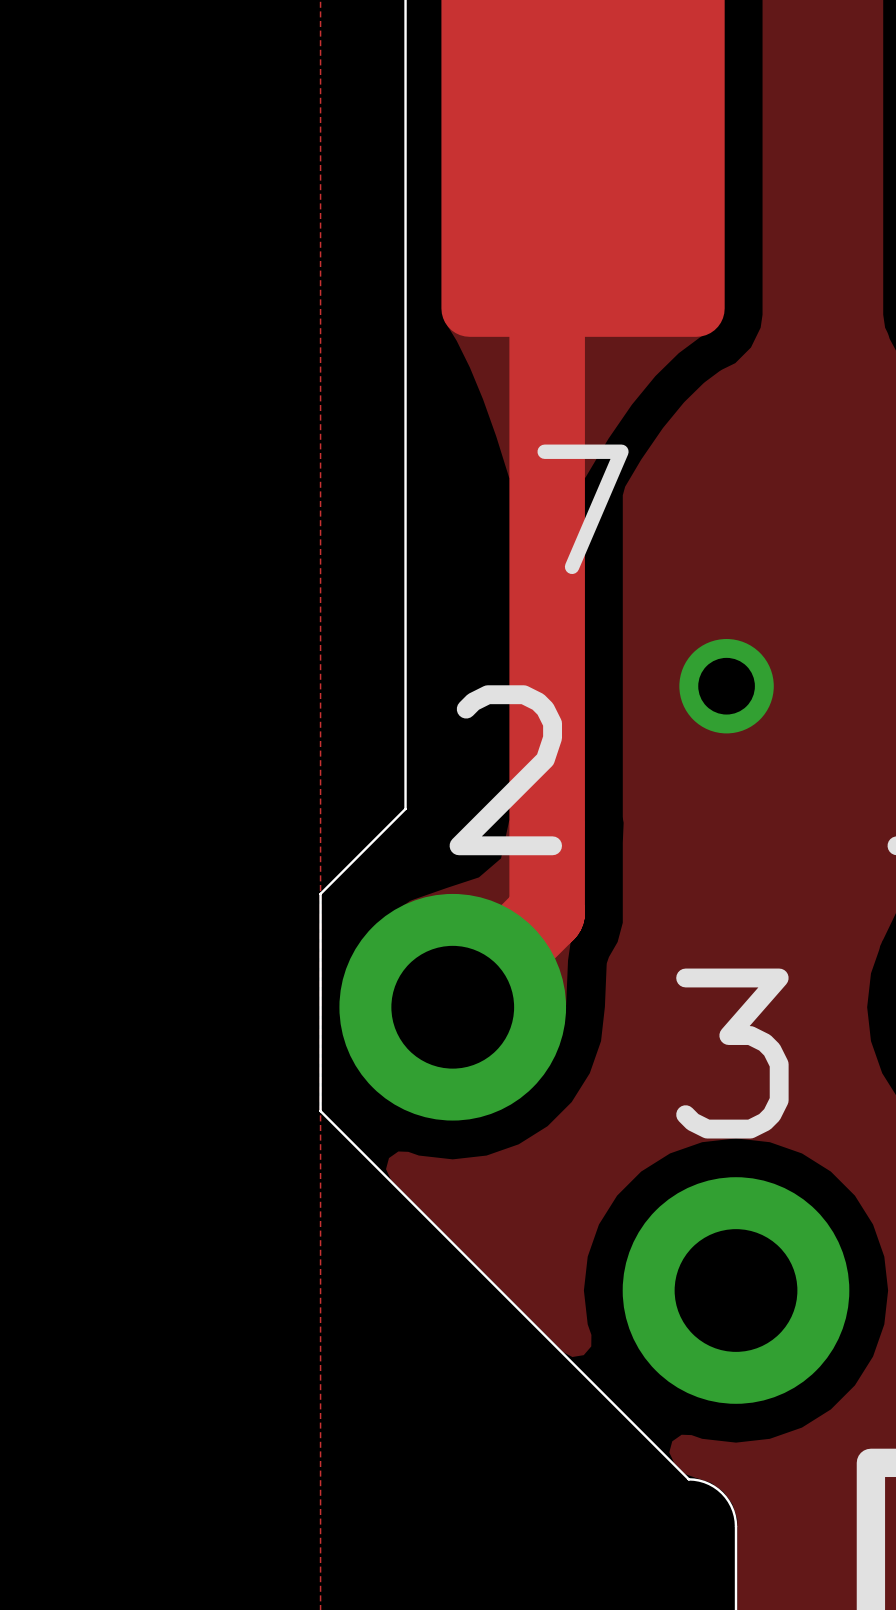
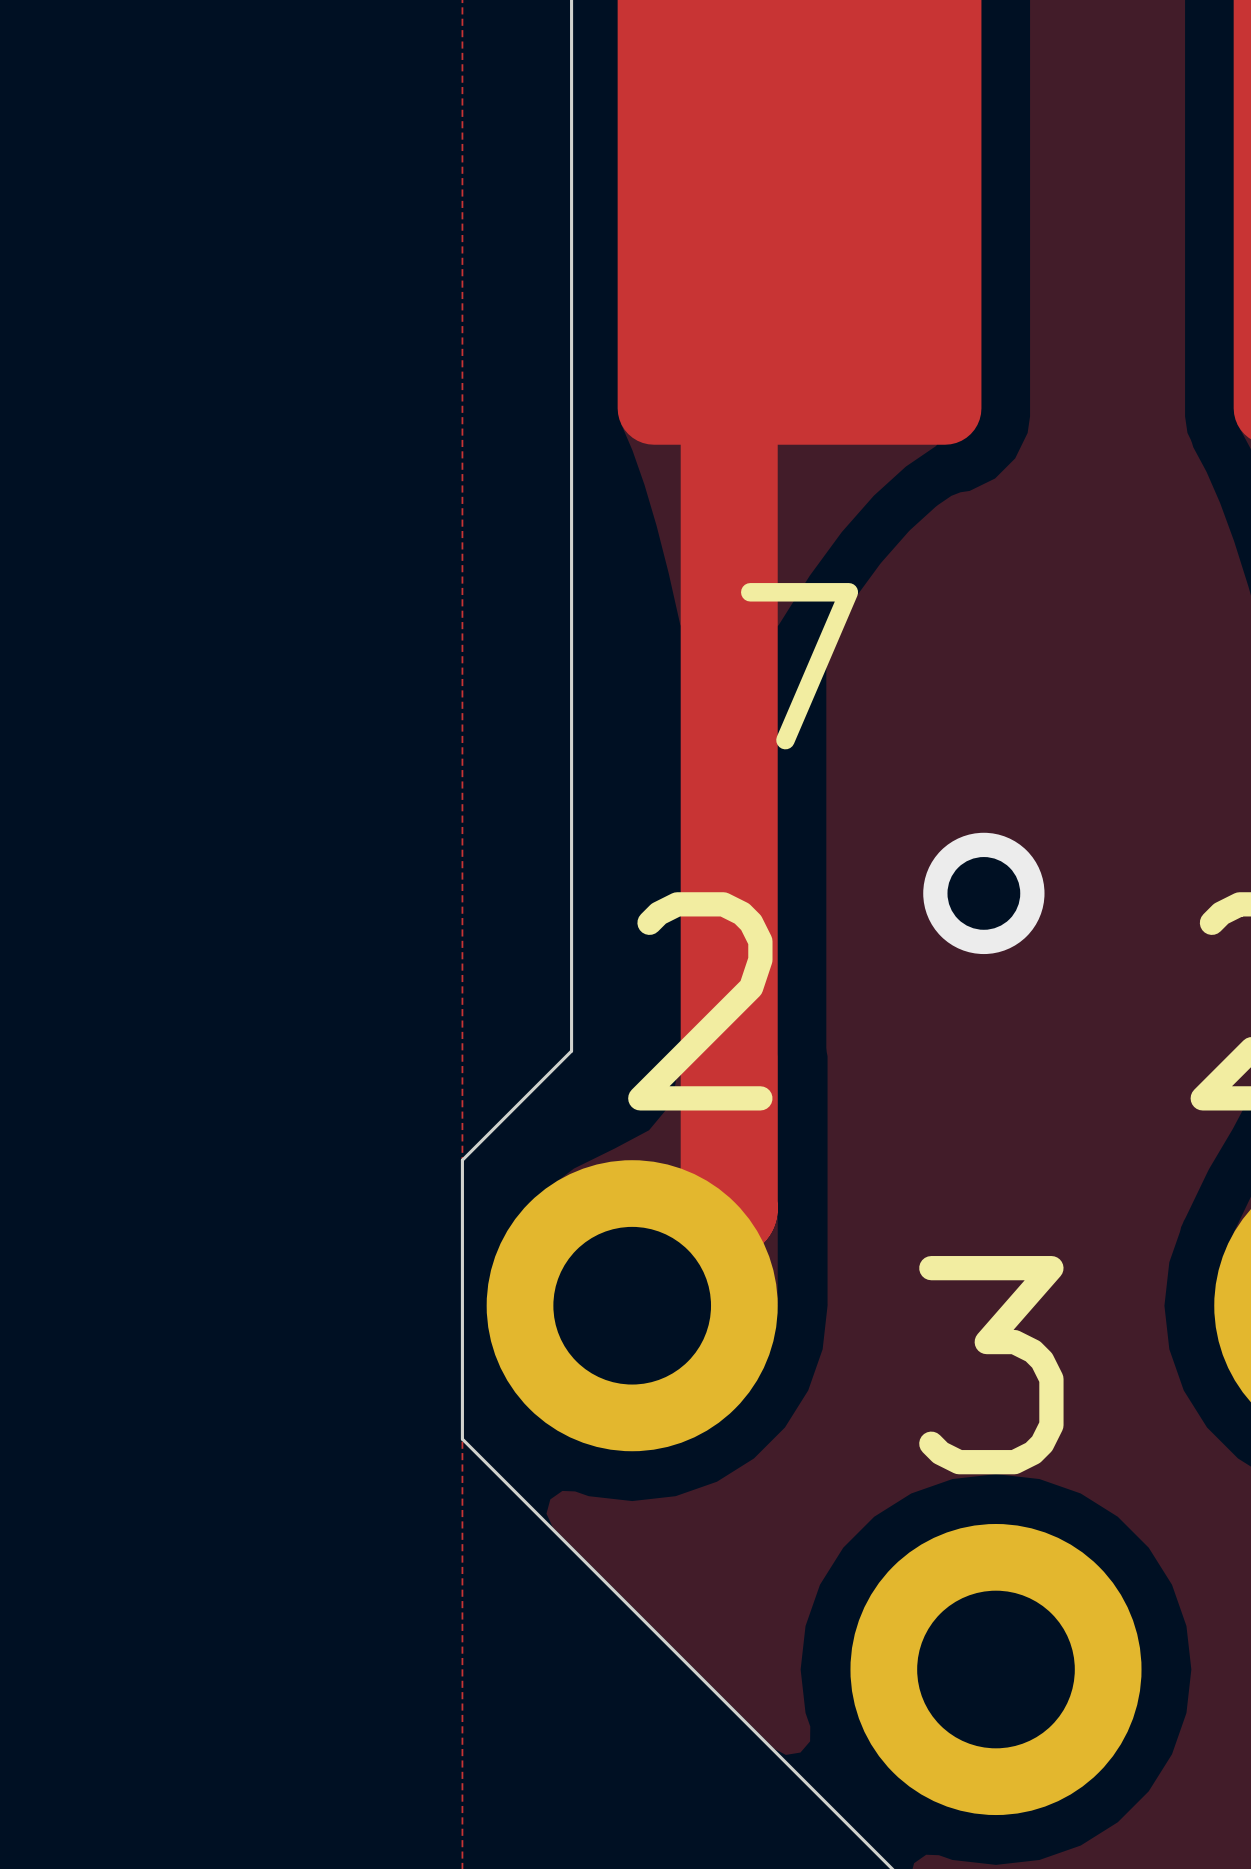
track: (547, 117) (547, 912) (528, 931) -> (753, 163) (729, 187) (729, 1208)

